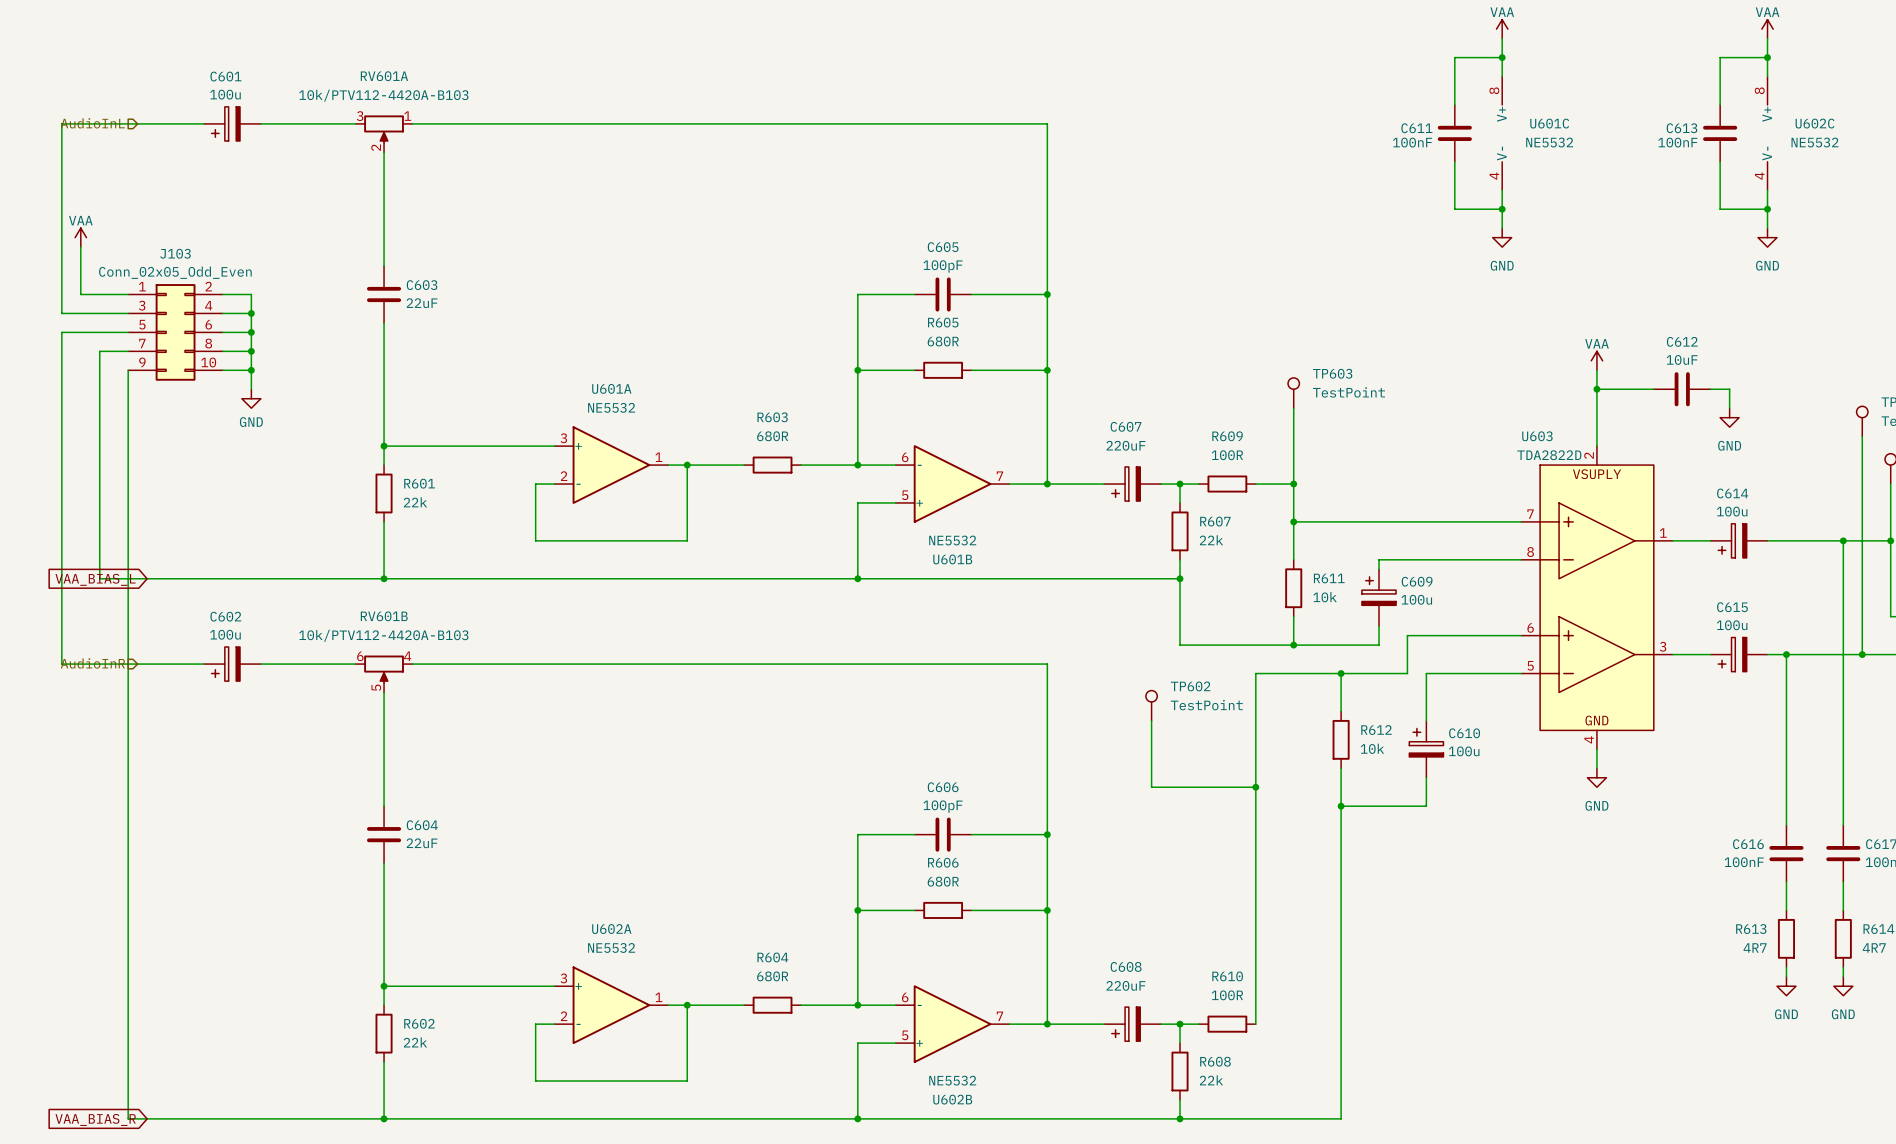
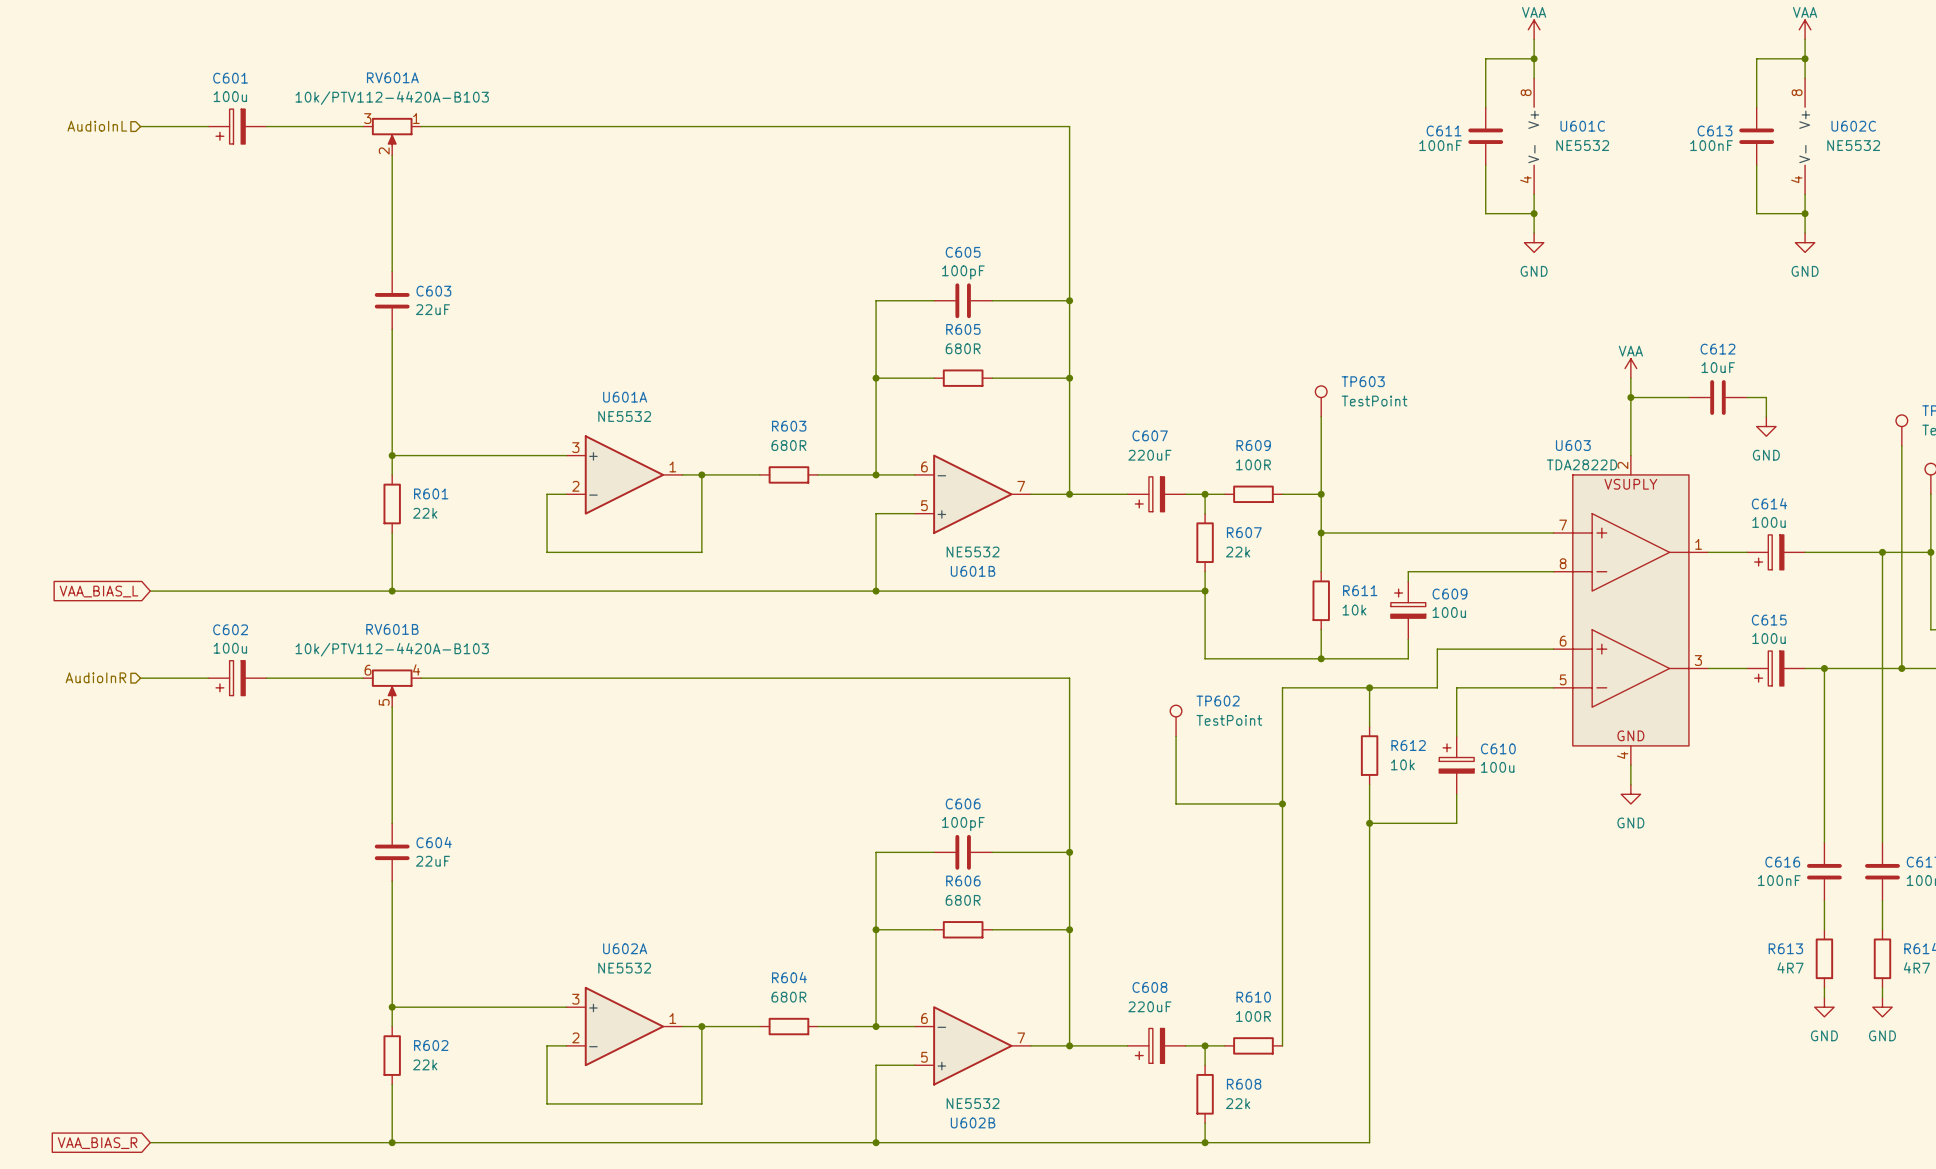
wire: (137, 123) (61, 123) (61, 313) (128, 313) -> none
power symbol: VAA (80, 237) -> none
wire: (80, 247) (80, 294) (128, 294) -> none
wire: (222, 294) (251, 294) (251, 389) -> none
wire: (222, 313) (251, 313) -> none
junction: (251, 313) -> none
wire: (128, 332) (61, 332) (61, 664) (137, 664) -> none
J103: Conn_02x05_Odd_Even (175, 332) -> none
wire: (222, 332) (251, 332) -> none
junction: (251, 332) -> none
wire: (128, 351) (99, 351) (99, 578) (147, 578) -> none
wire: (222, 351) (251, 351) -> none
junction: (251, 351) -> none
wire: (128, 370) (128, 1118) (147, 1118) -> none
wire: (222, 370) (251, 370) -> none
junction: (251, 370) -> none
power symbol: GND (251, 398) -> none

